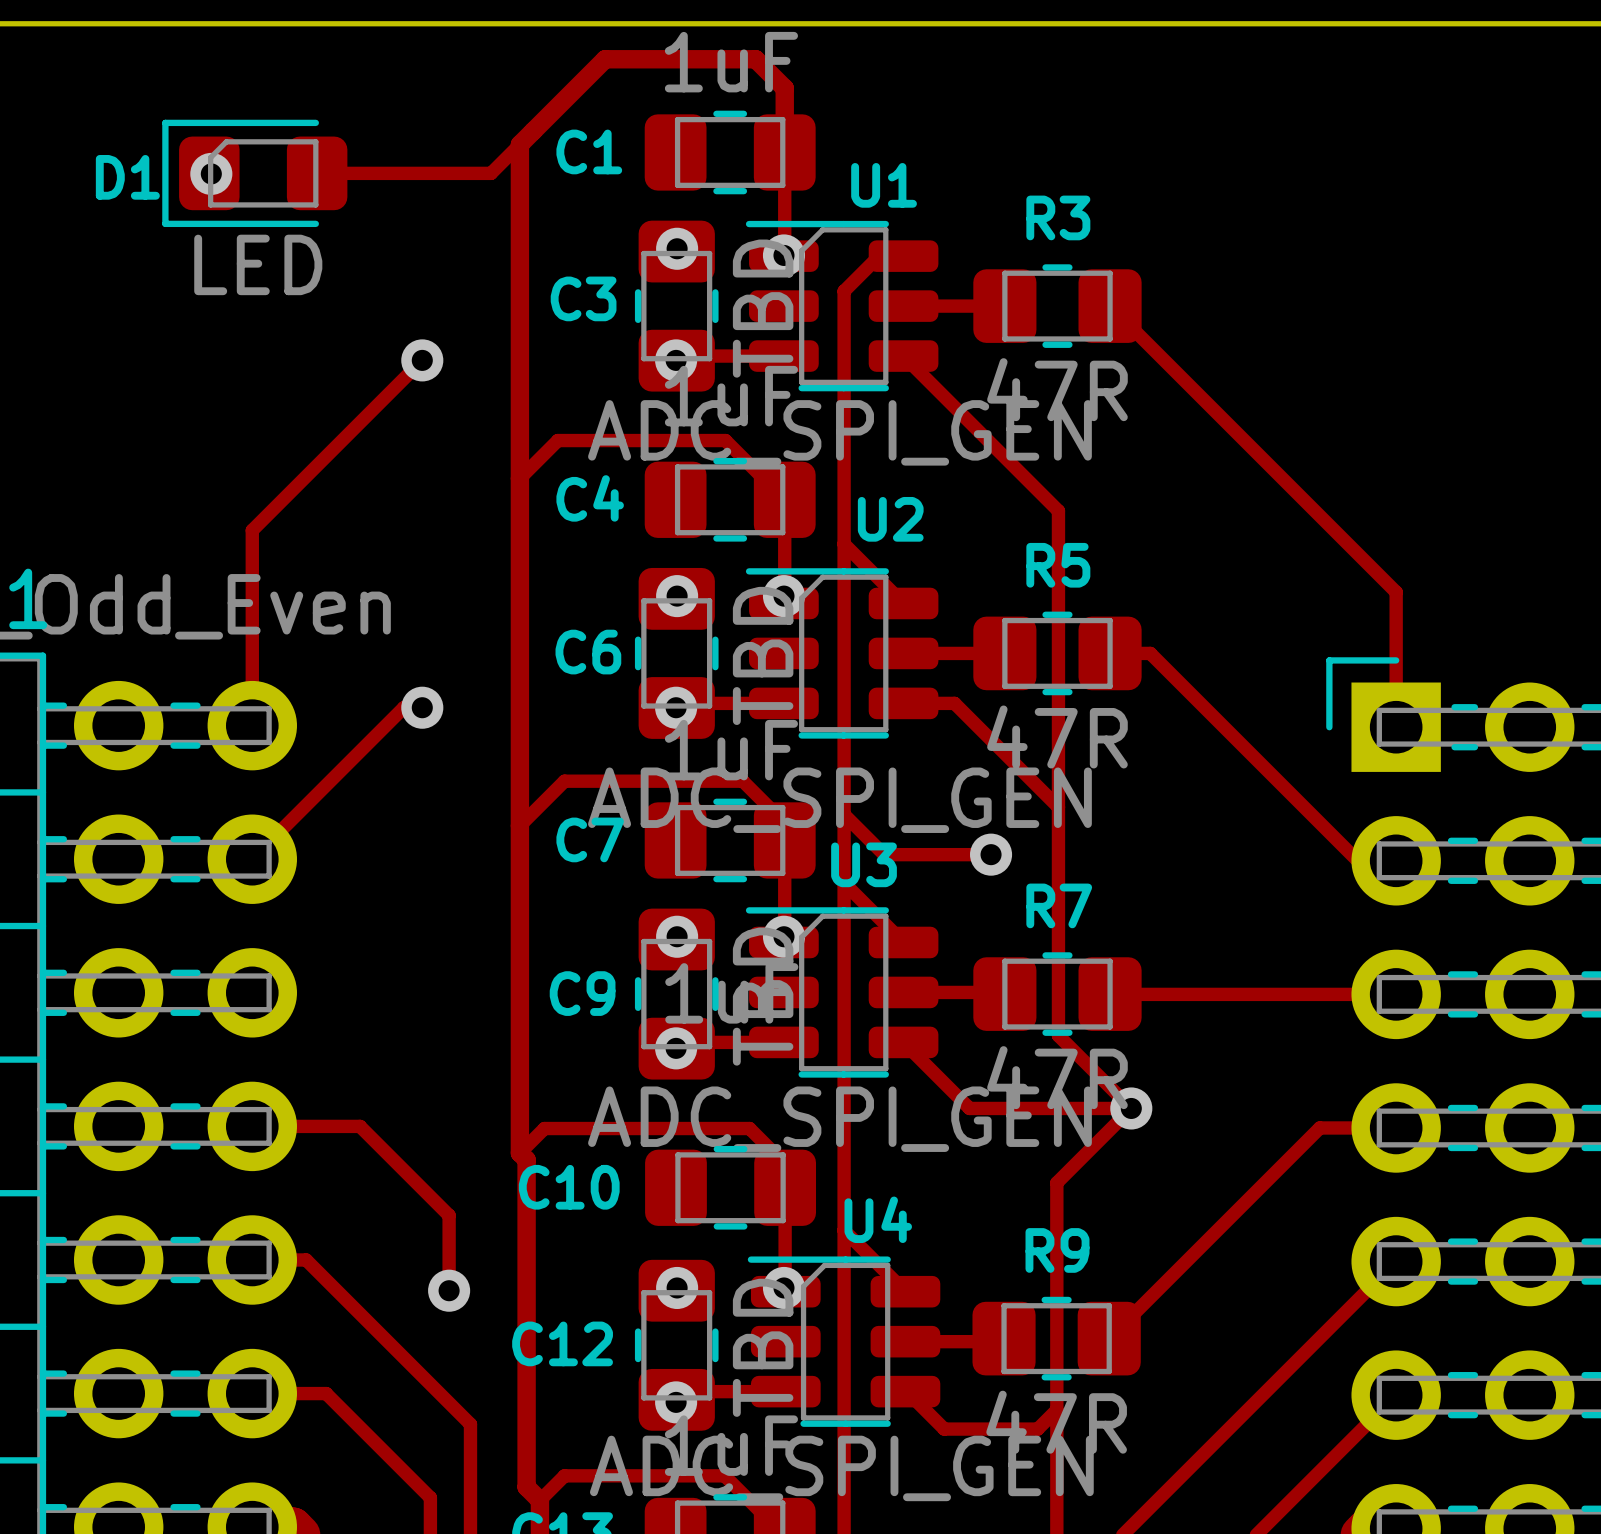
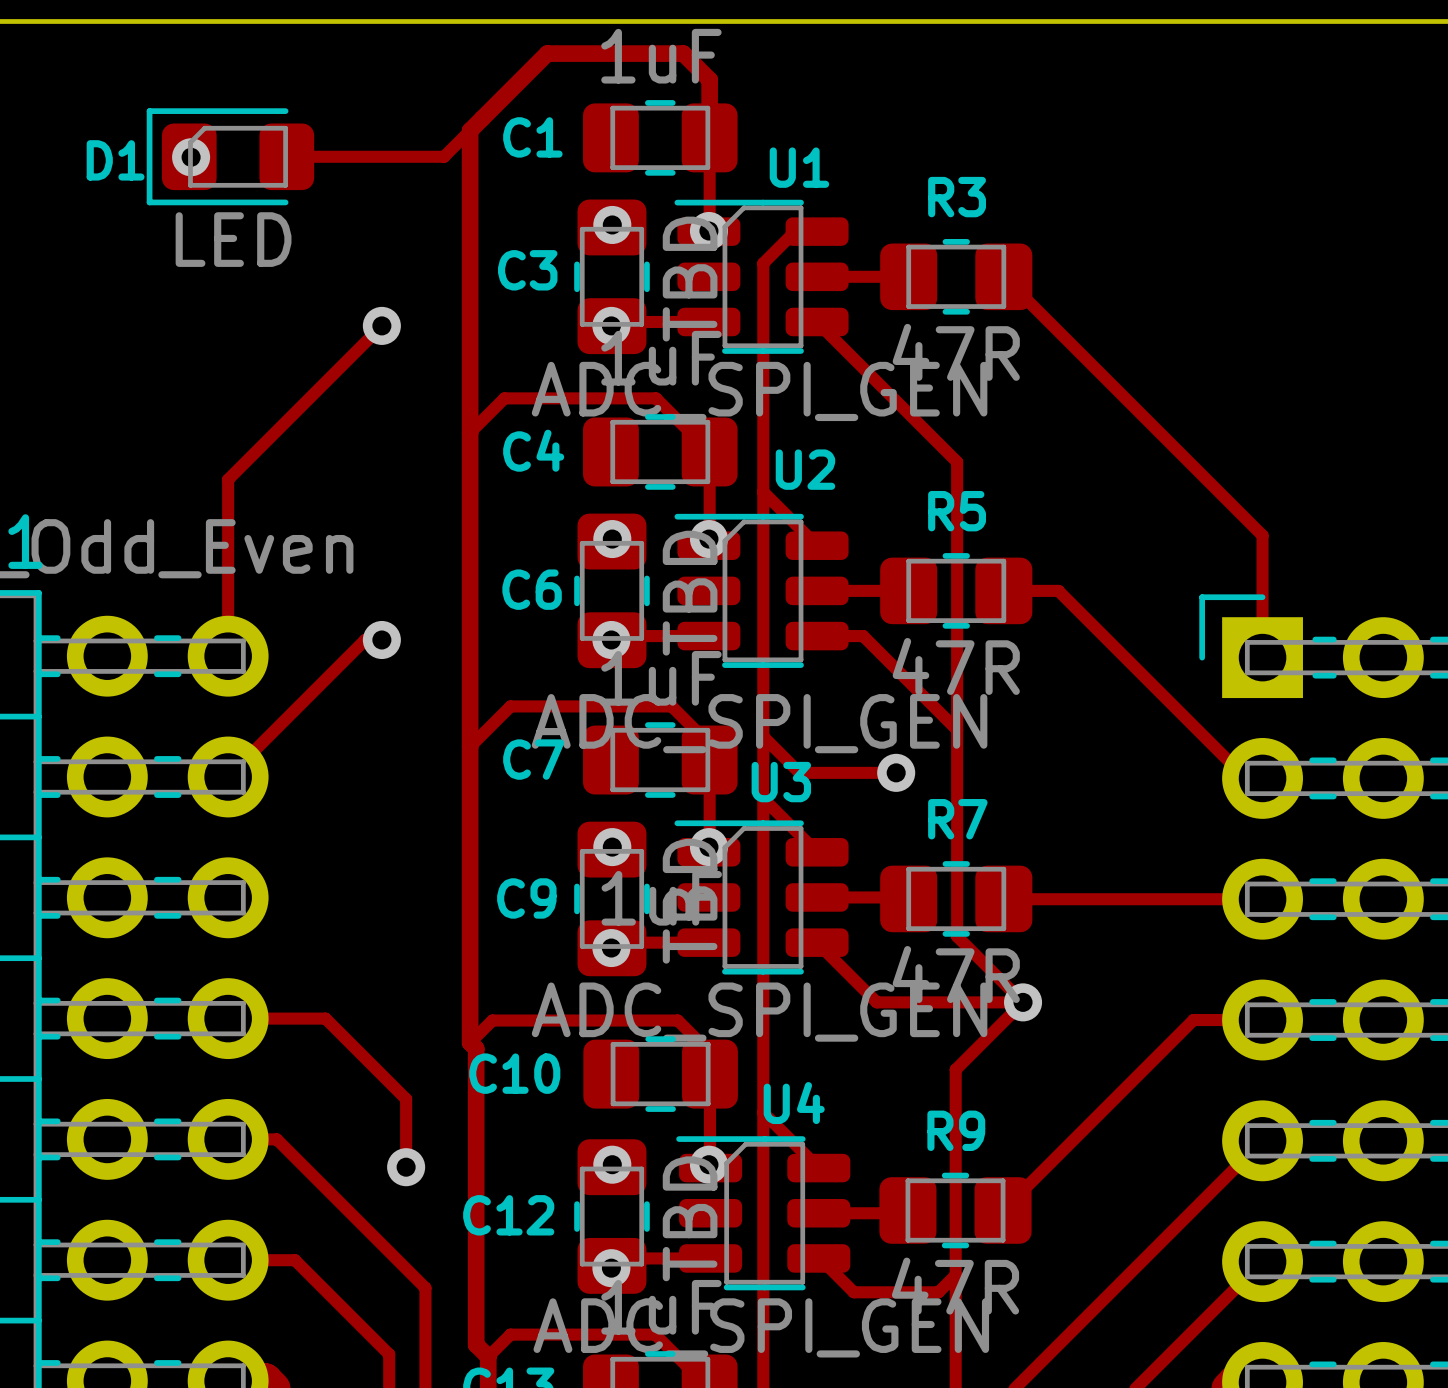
track: (1150, 653) (1357, 860) (1377, 860) -> (1040, 590) (1058, 590) (1246, 778)

